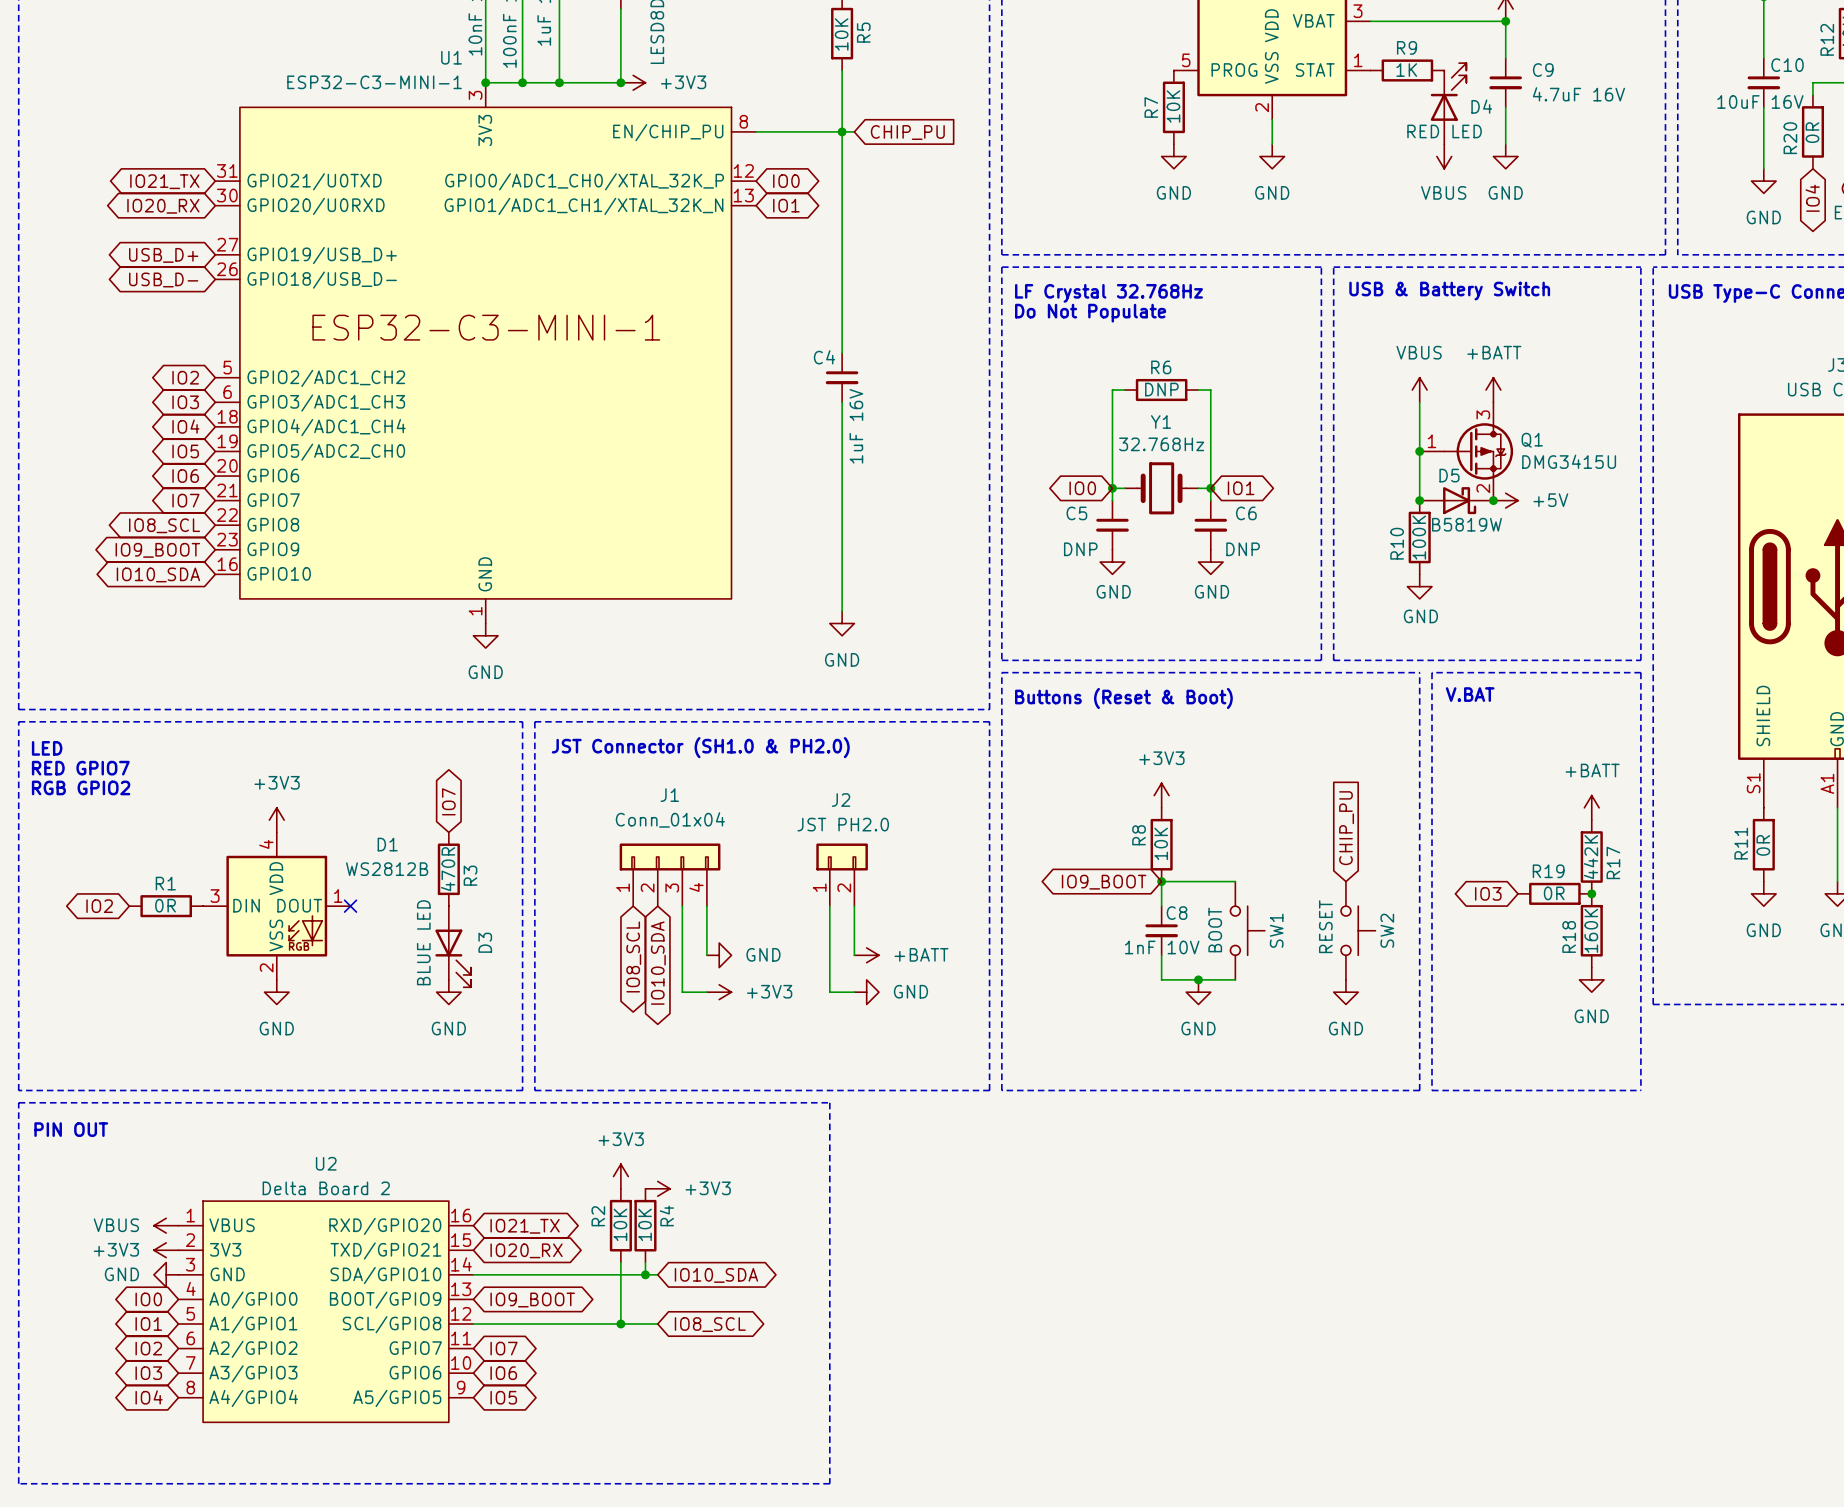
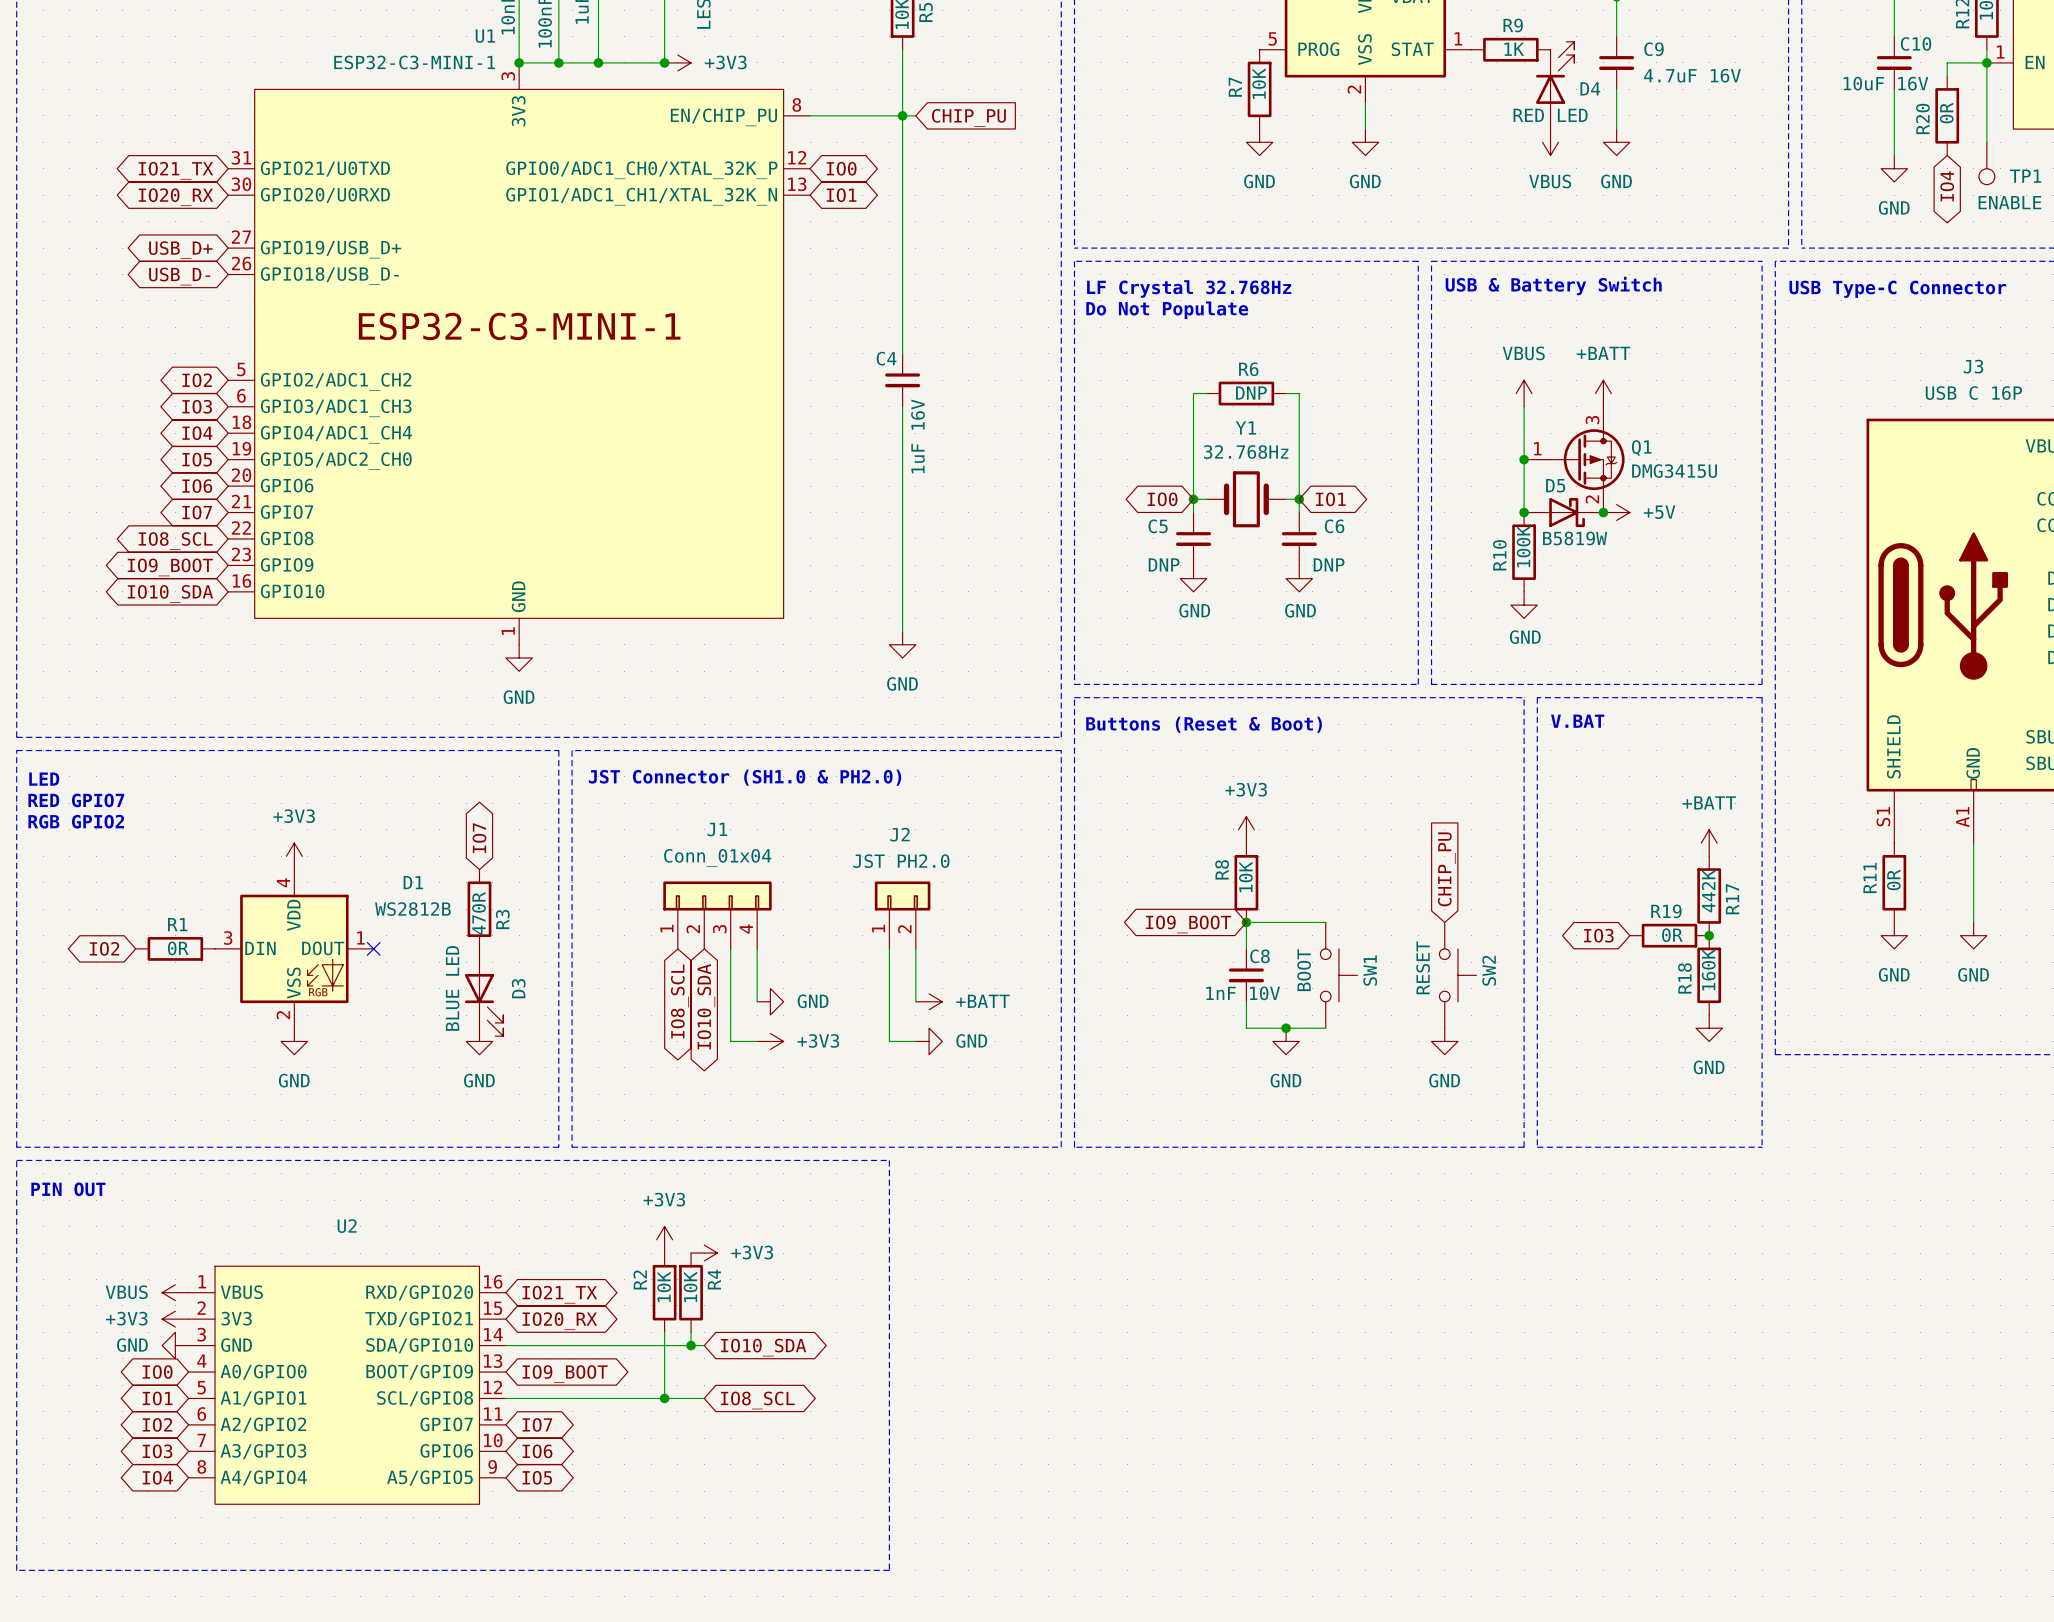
U2 value: Delta Board 2 (326, 1188) -> none

